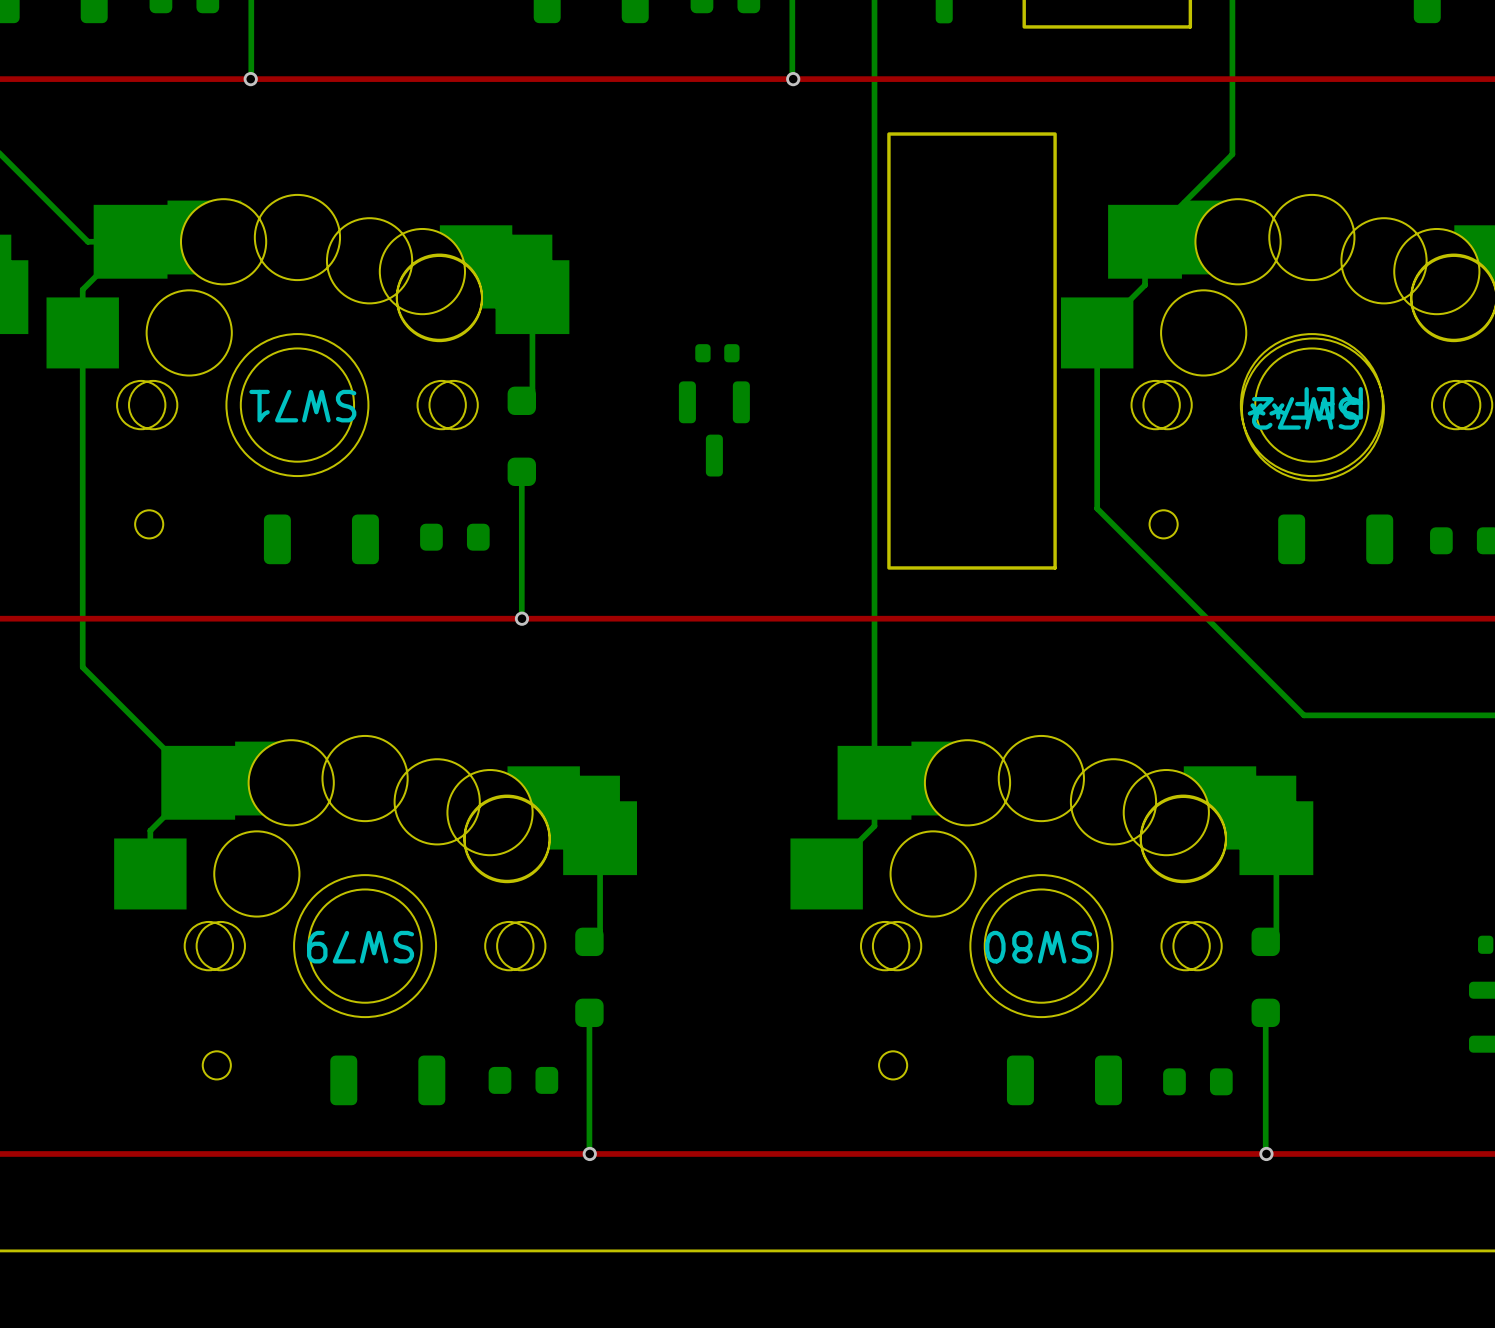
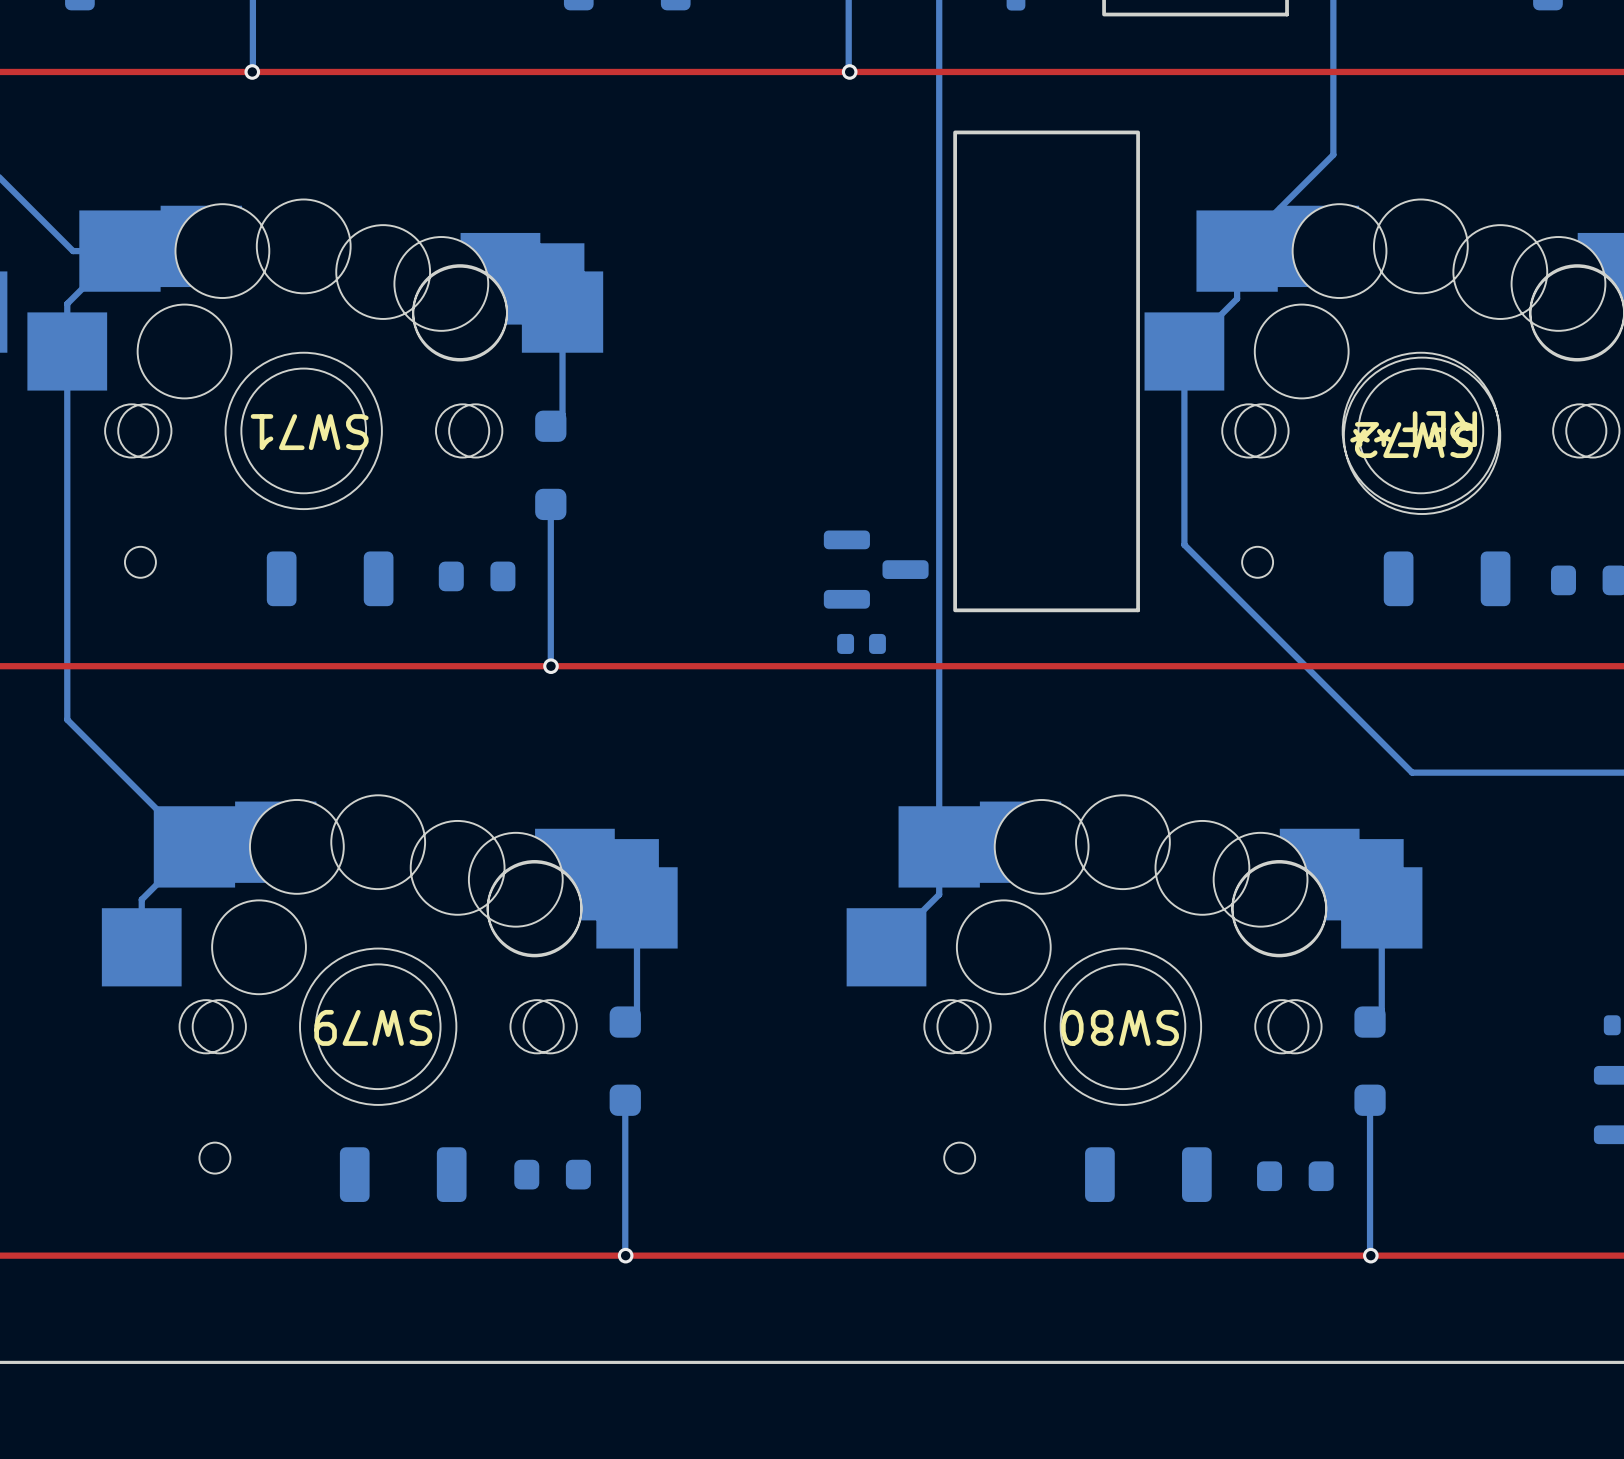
part position: (717, 353) -> (861, 643)
part rotation: 0° (714, 428) -> 90° counterclockwise (876, 569)
part position: (714, 428) -> (876, 569)

